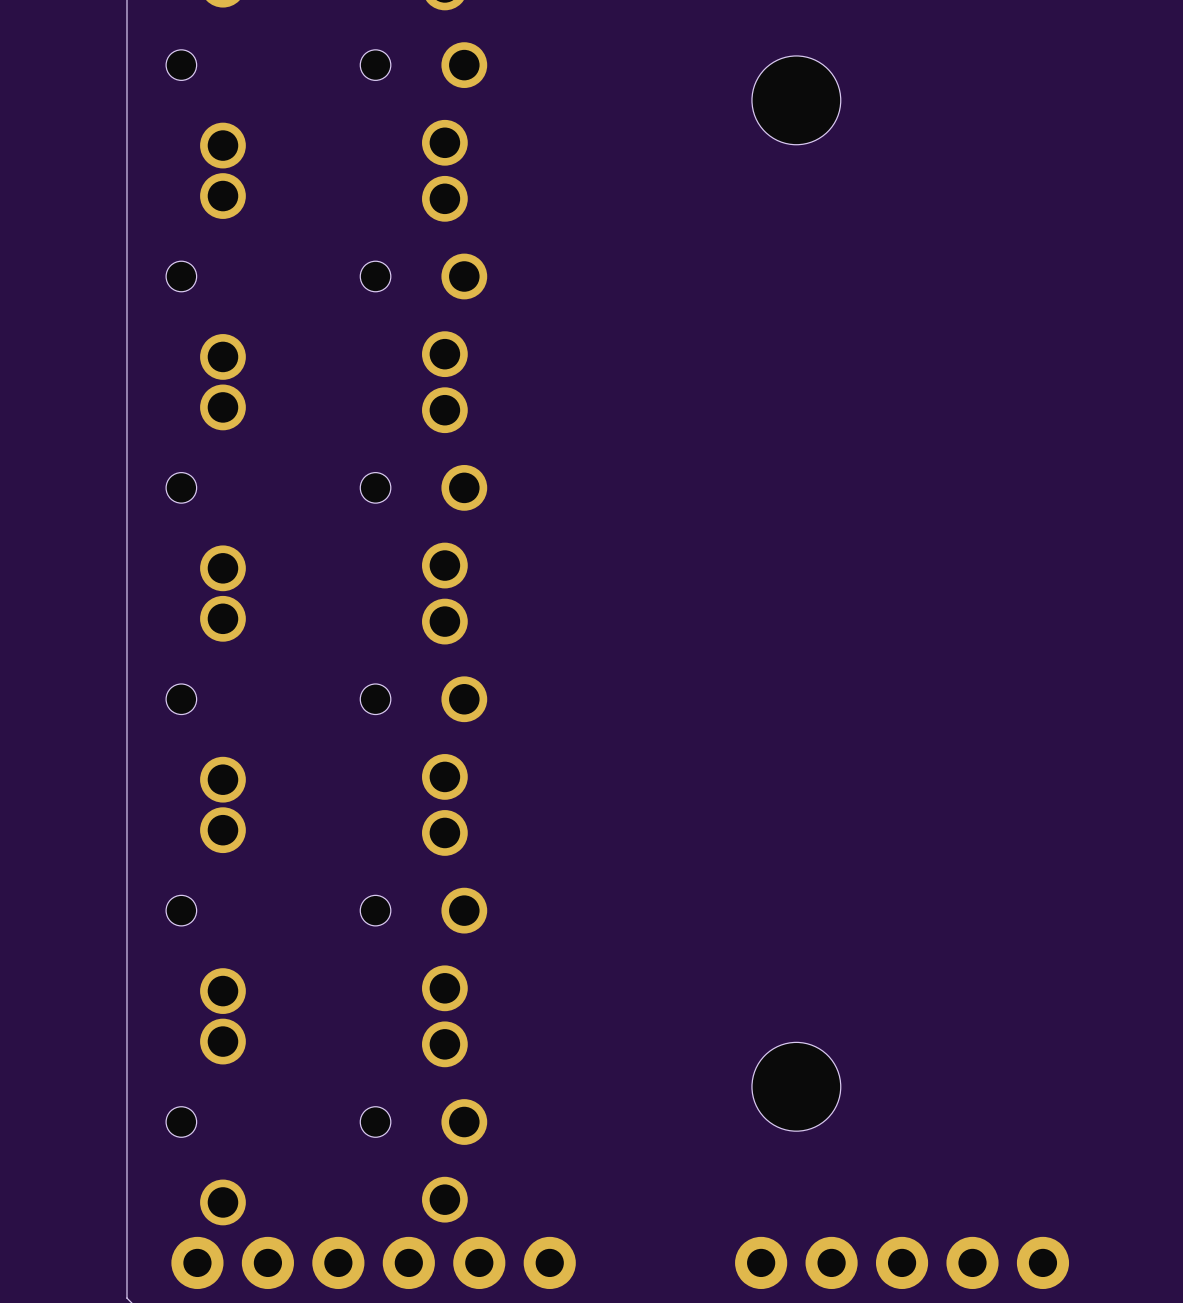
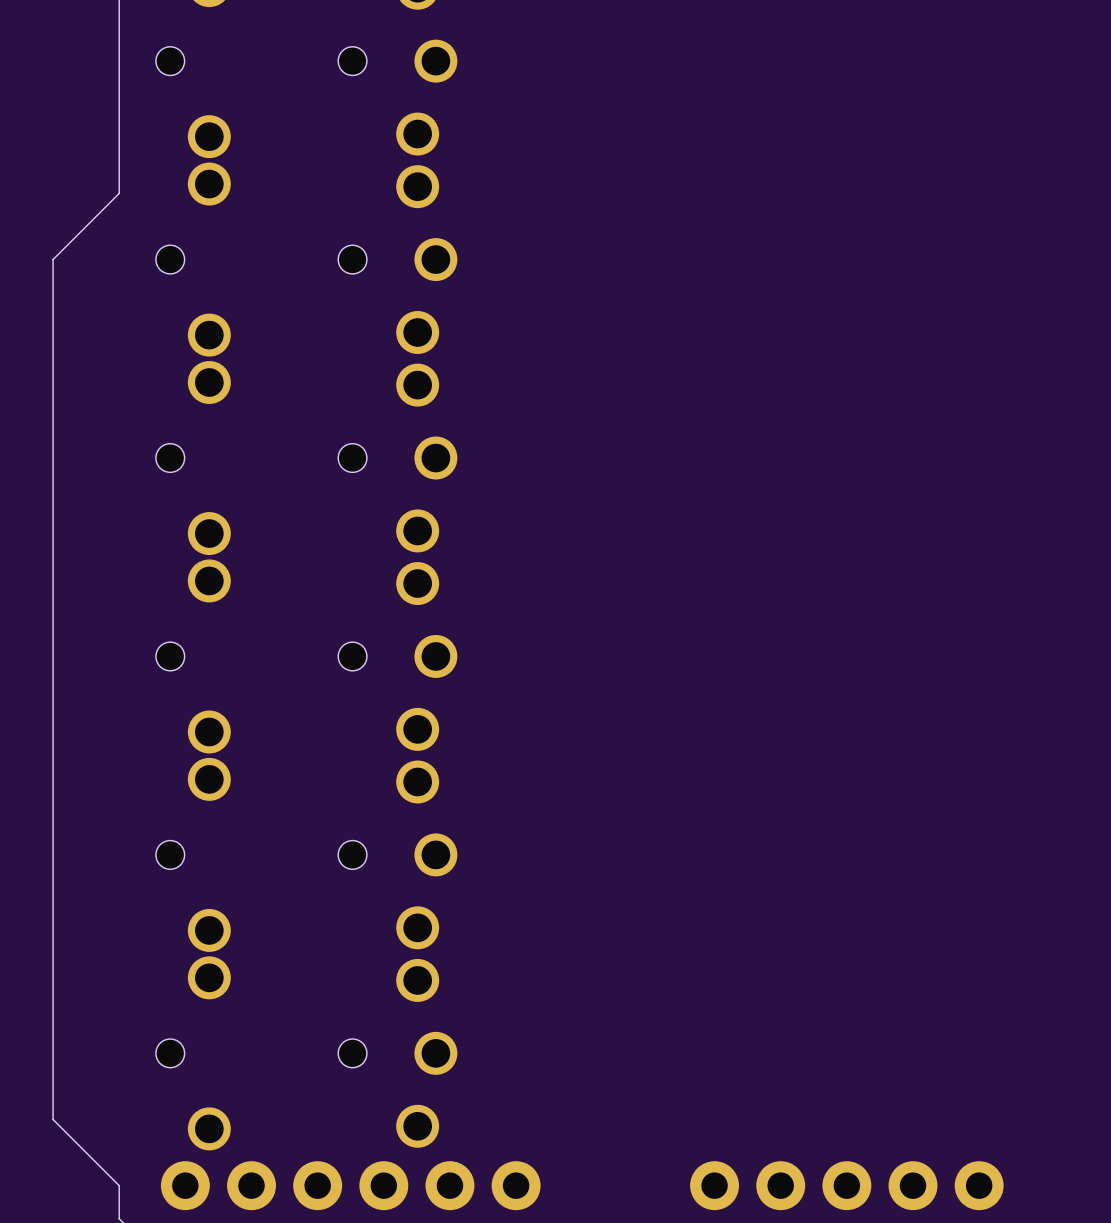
hole: (796, 100) -> none
board edge: (126, 206) (126, 1262) -> (119, 193) (53, 259) (53, 1119) (119, 1185)
hole: (796, 1086) -> none

